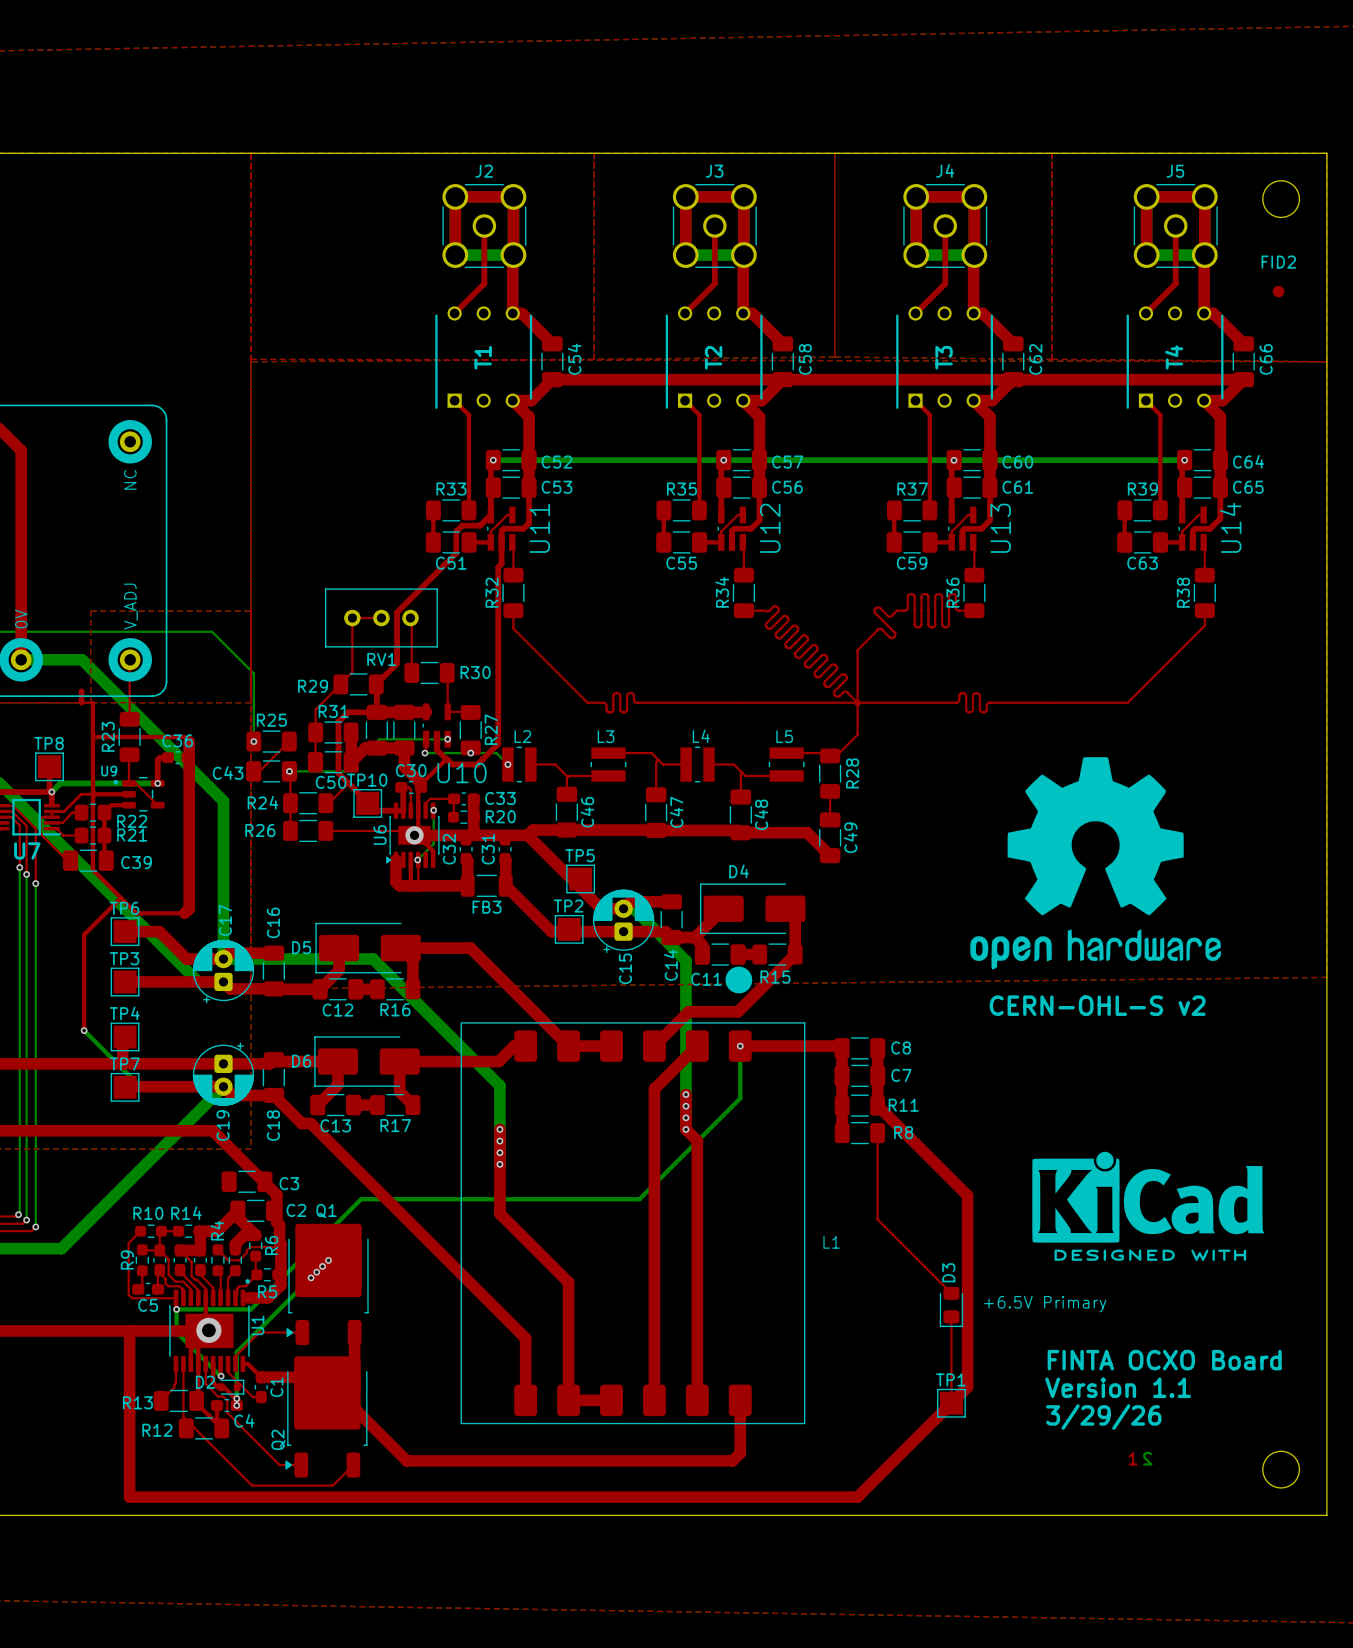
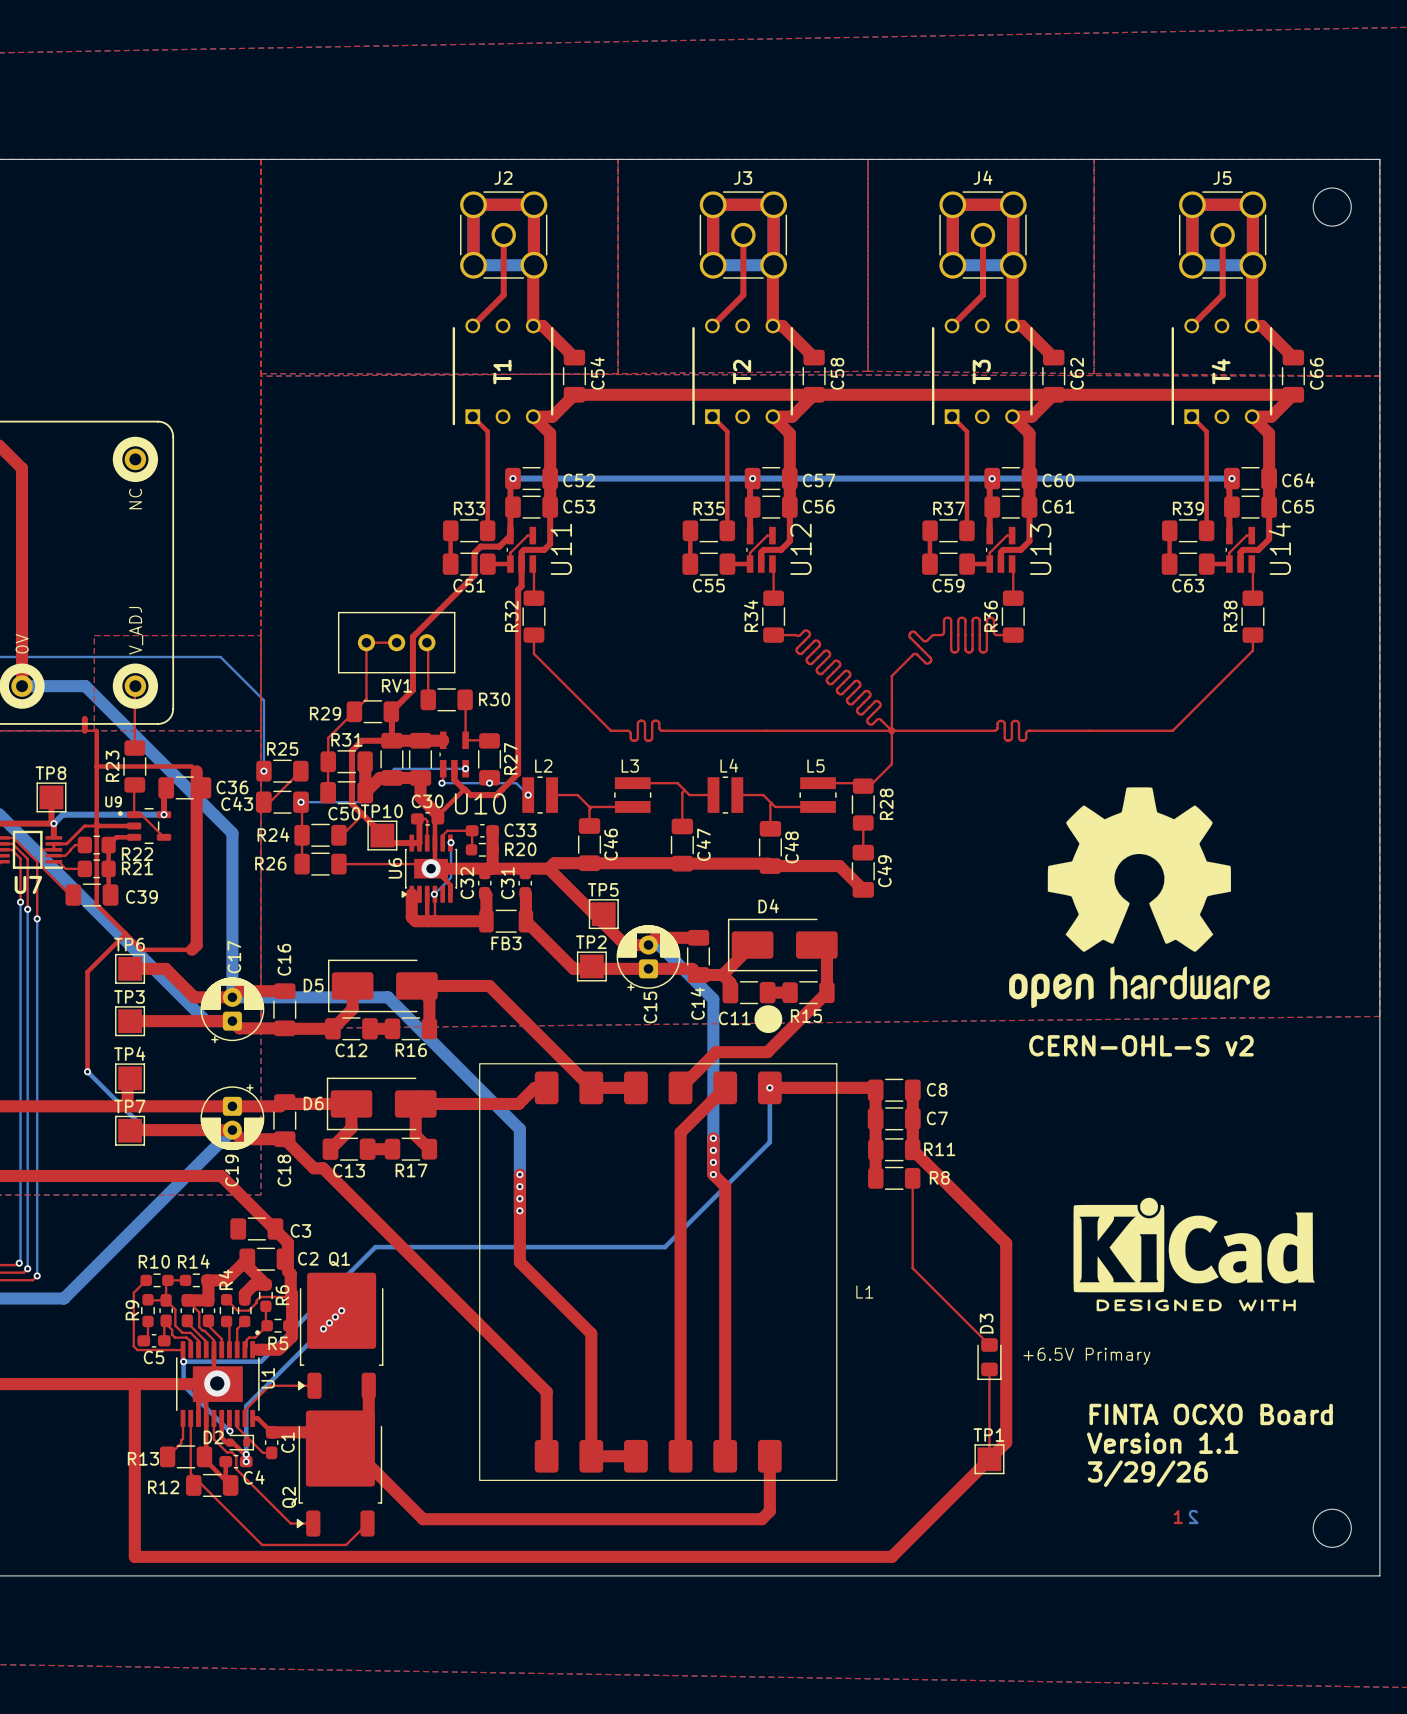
FID2: (1278, 291) -> none
C36 name position: C36 (177, 740) -> C36 (232, 787)
C36 footprint: [161, 751, 194, 765] -> [158, 776, 212, 800]

